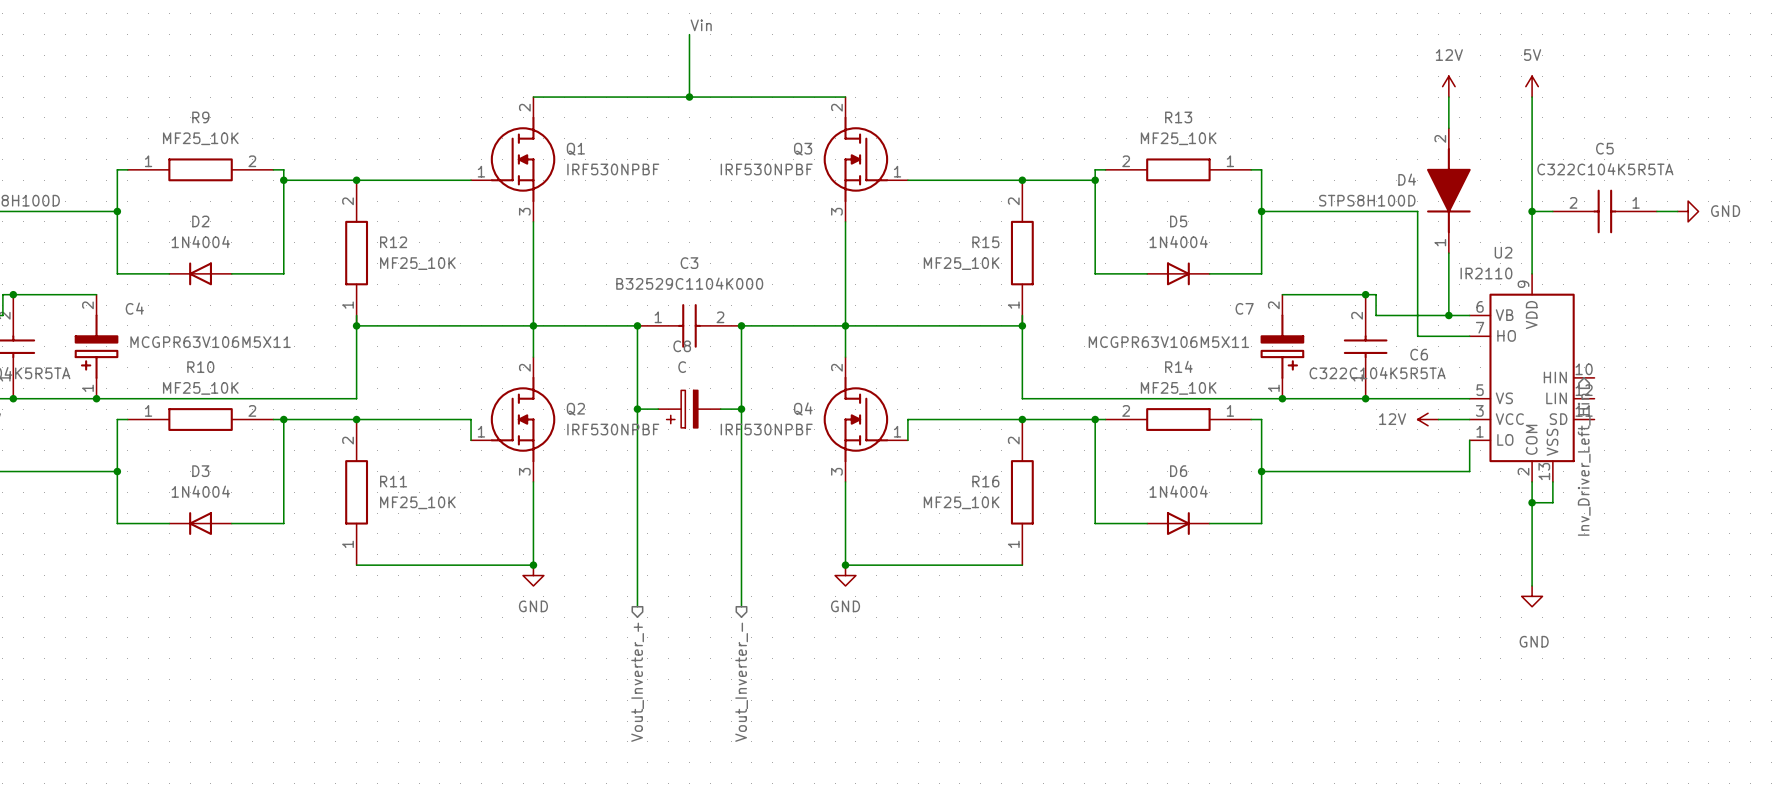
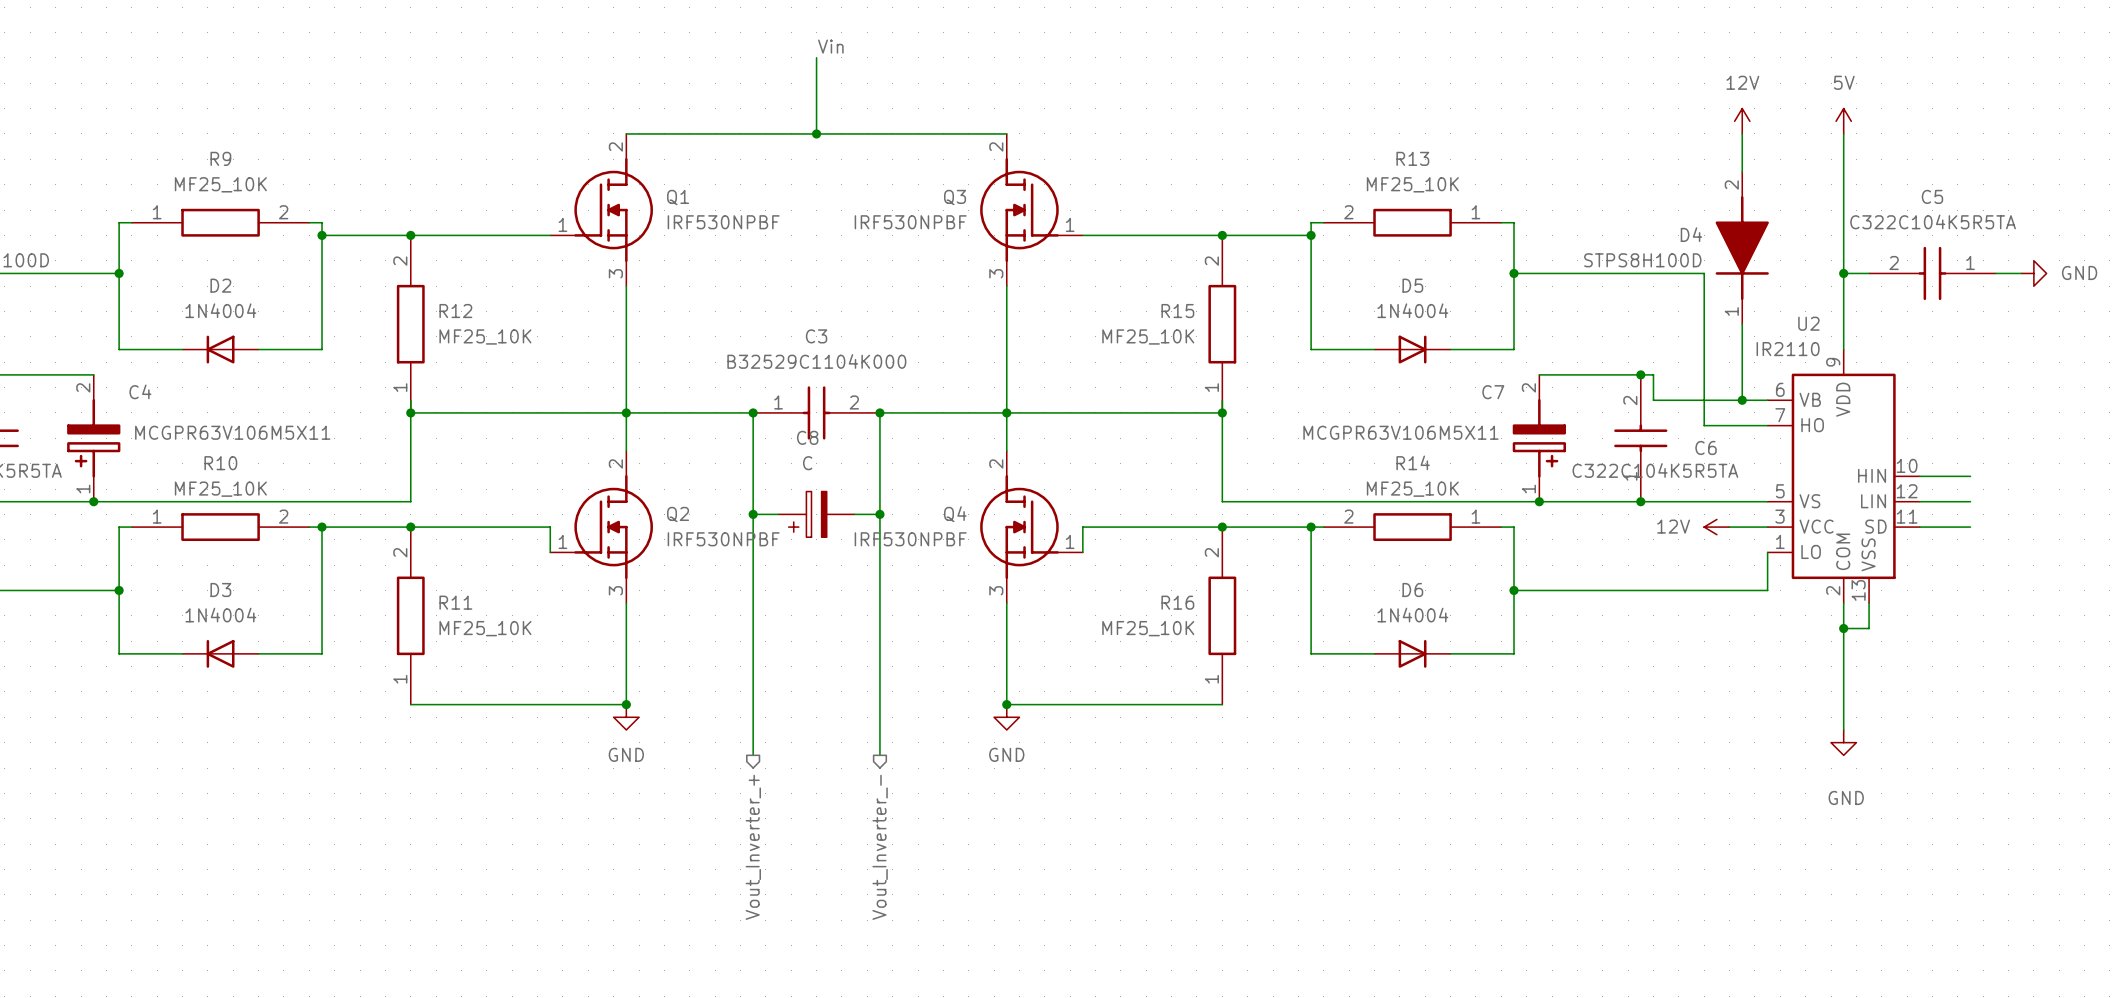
wire: none -> (1919, 476) (1970, 476)
wire: none -> (1919, 501) (1970, 501)
wire: none -> (1919, 527) (1970, 527)
hierarchical label: Inv_Driver_Left_Hin (1584, 464) -> none

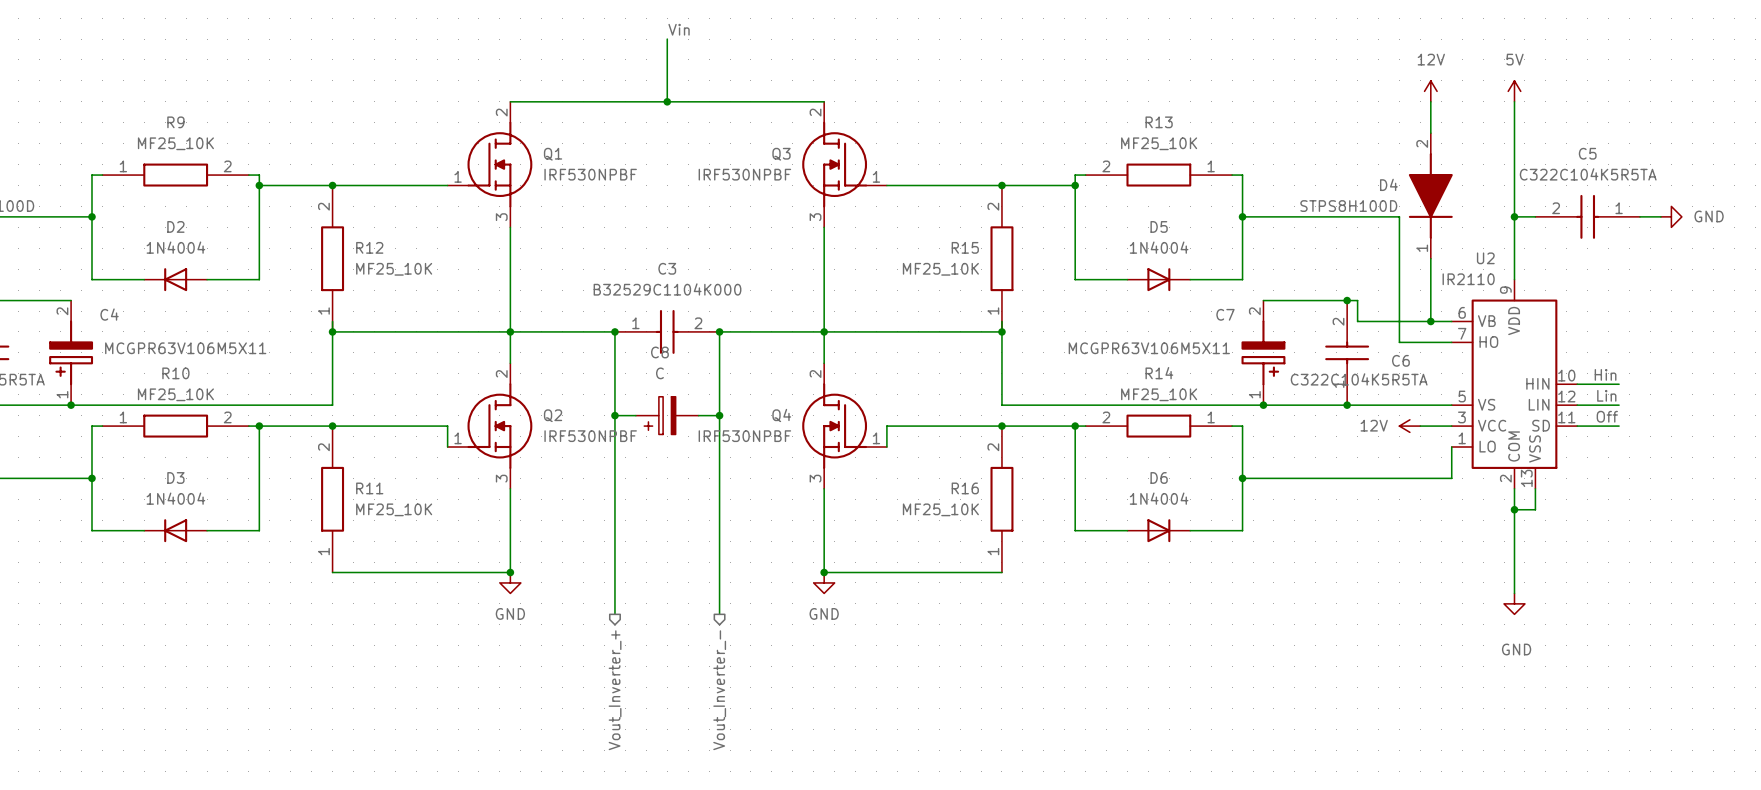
label: none -> Hin (1605, 374)
label: none -> Lin (1606, 395)
label: none -> Off (1607, 416)

